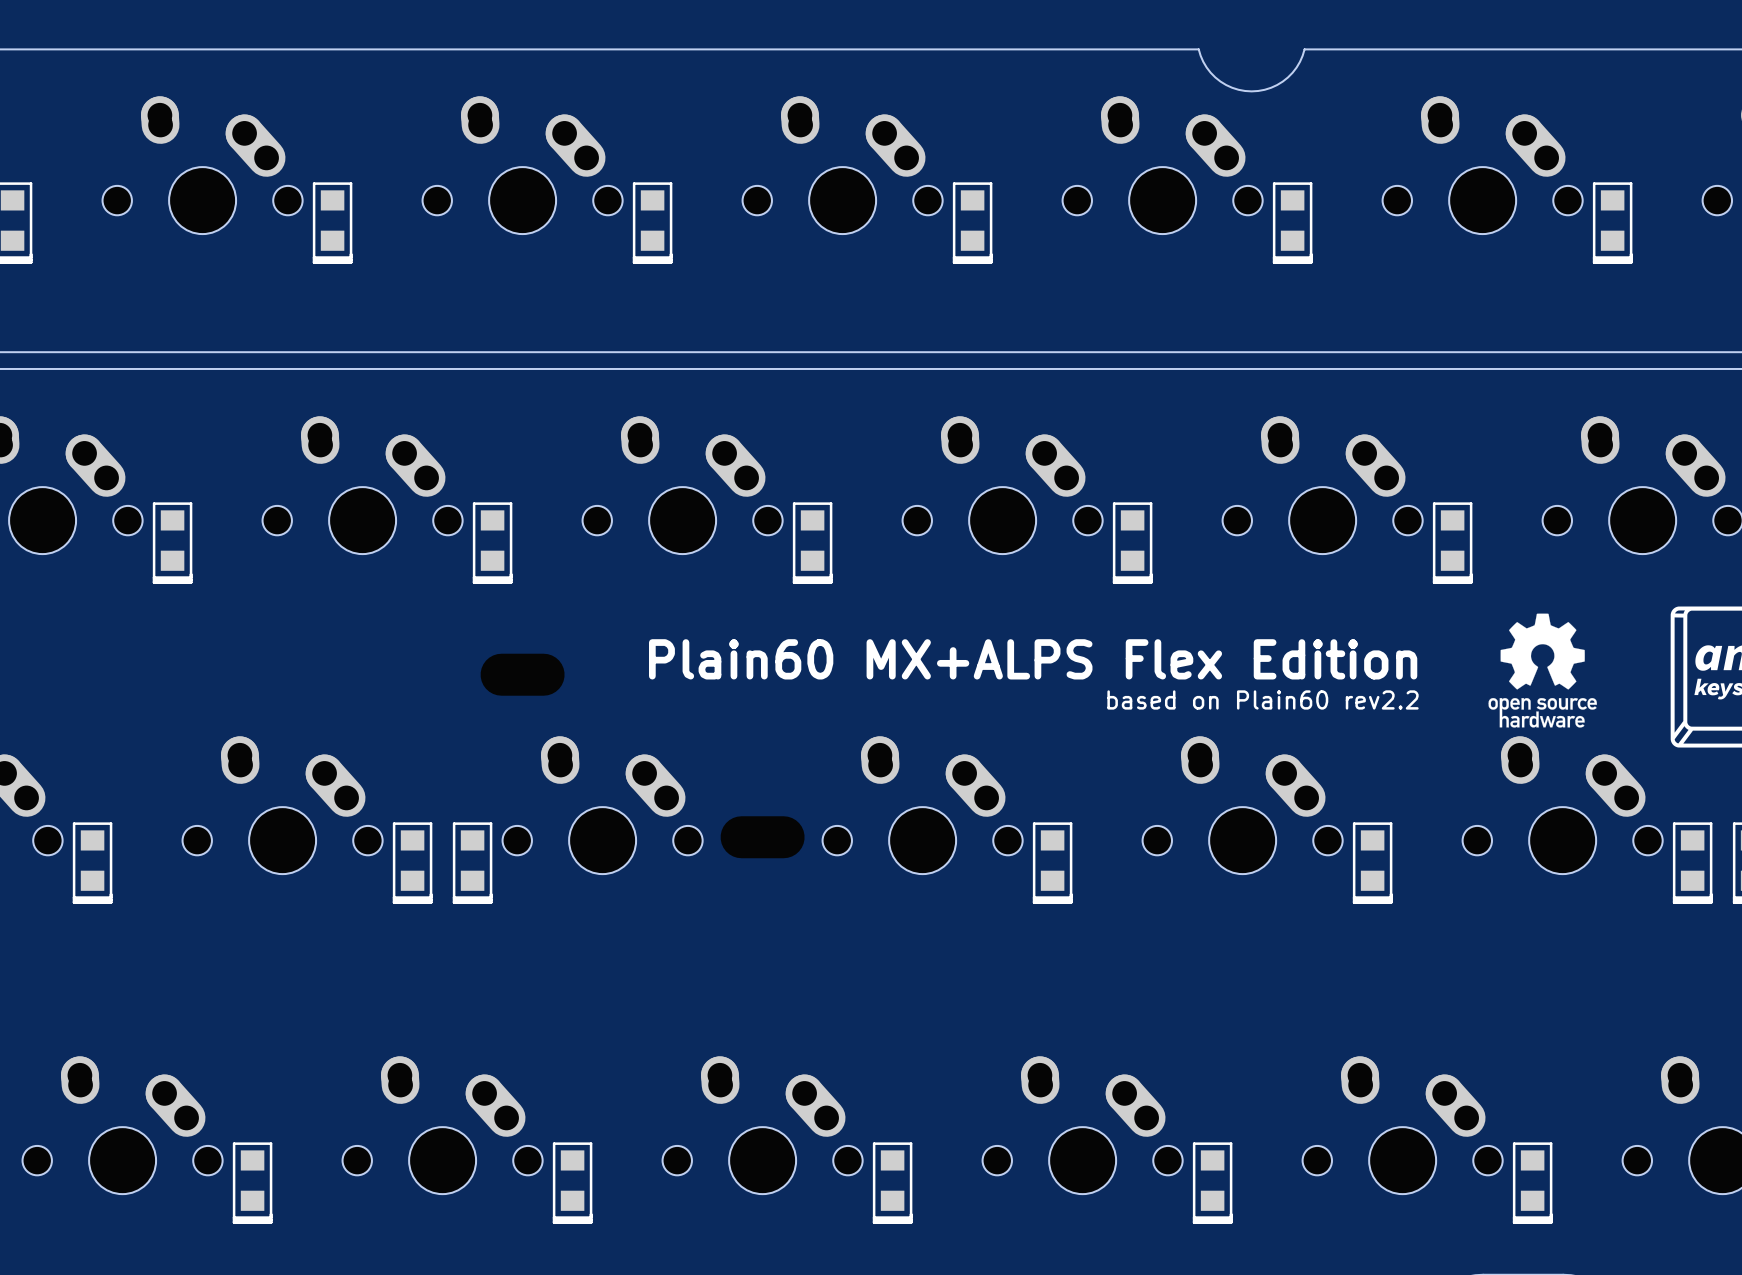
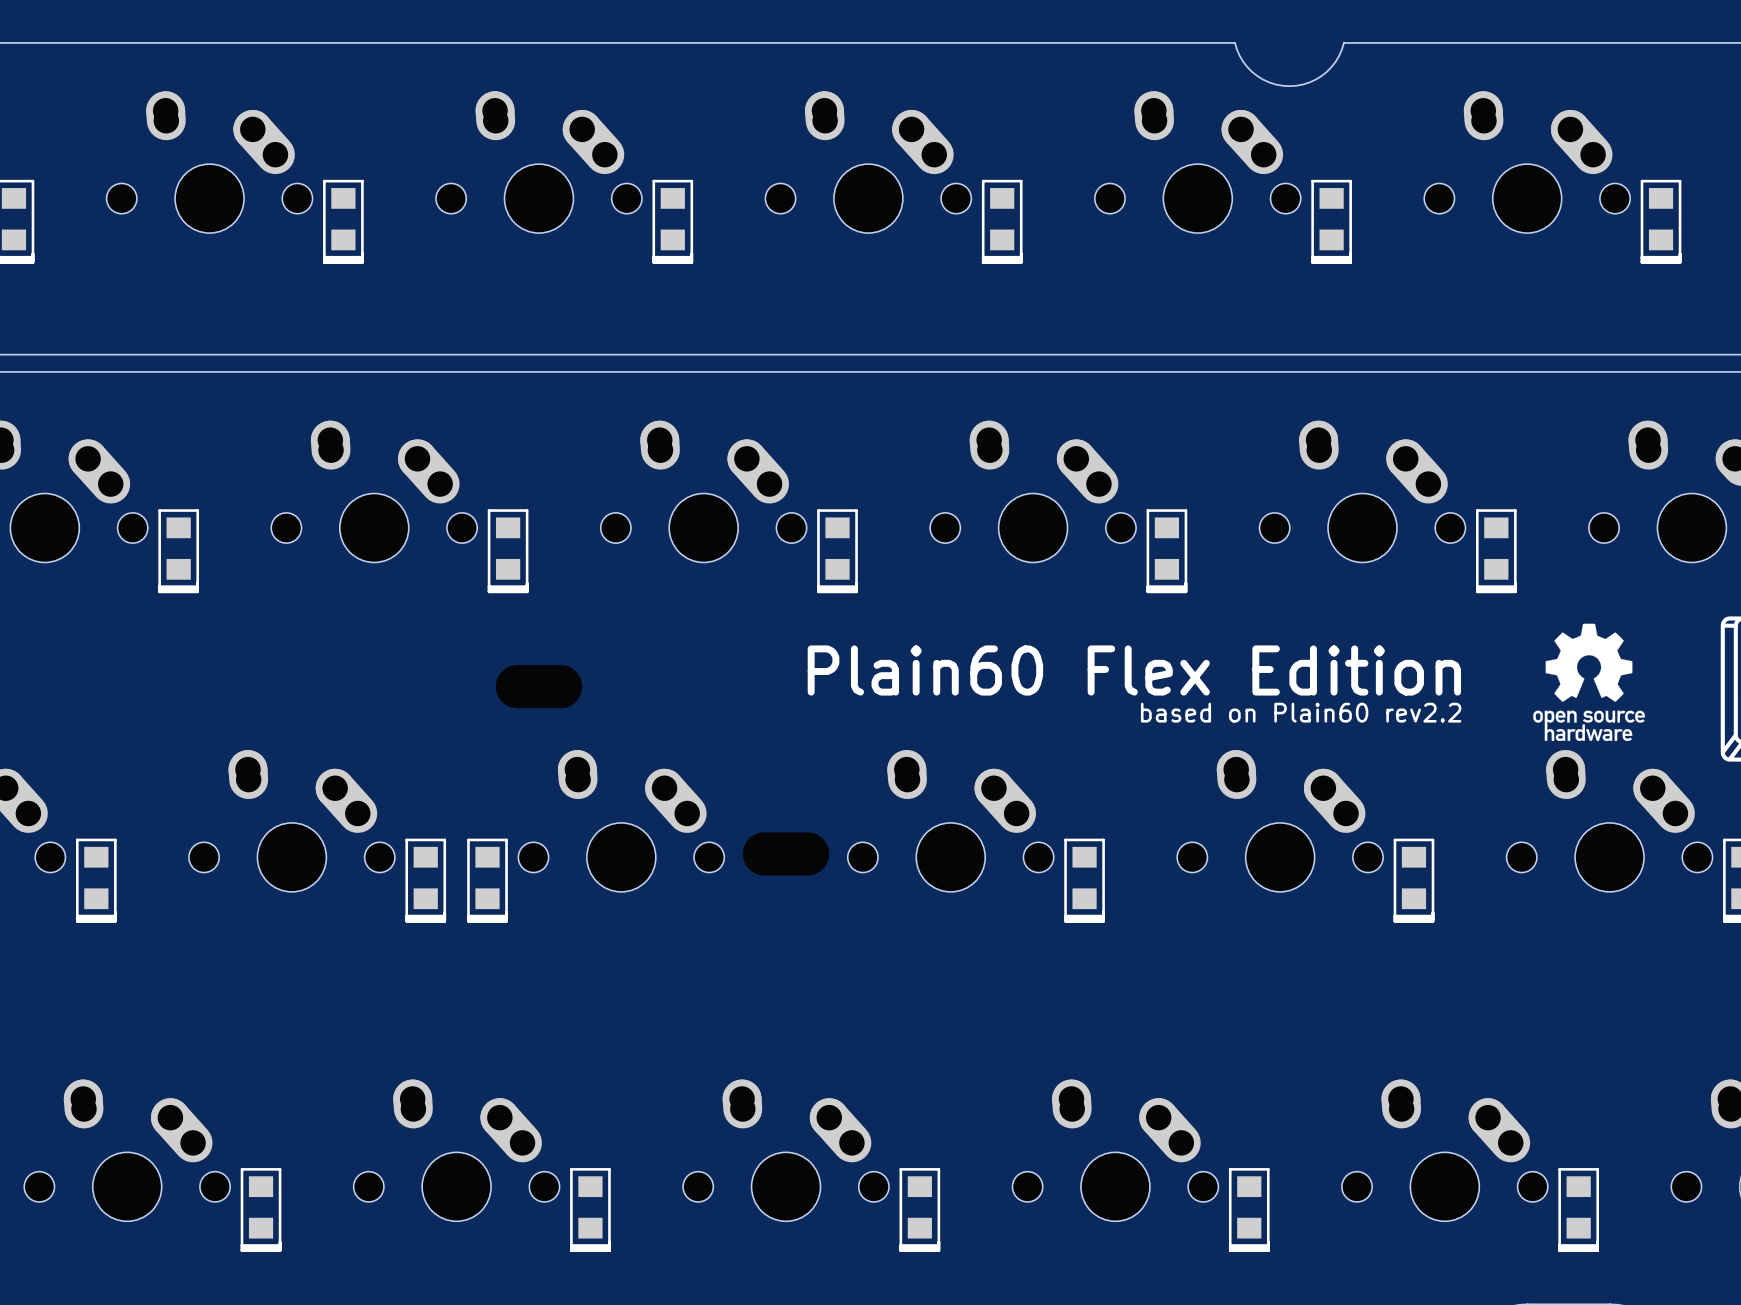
text: Plain60 MX+ALPS Flex Edition (1033, 659) -> Plain60 Flex Edition (1134, 670)

